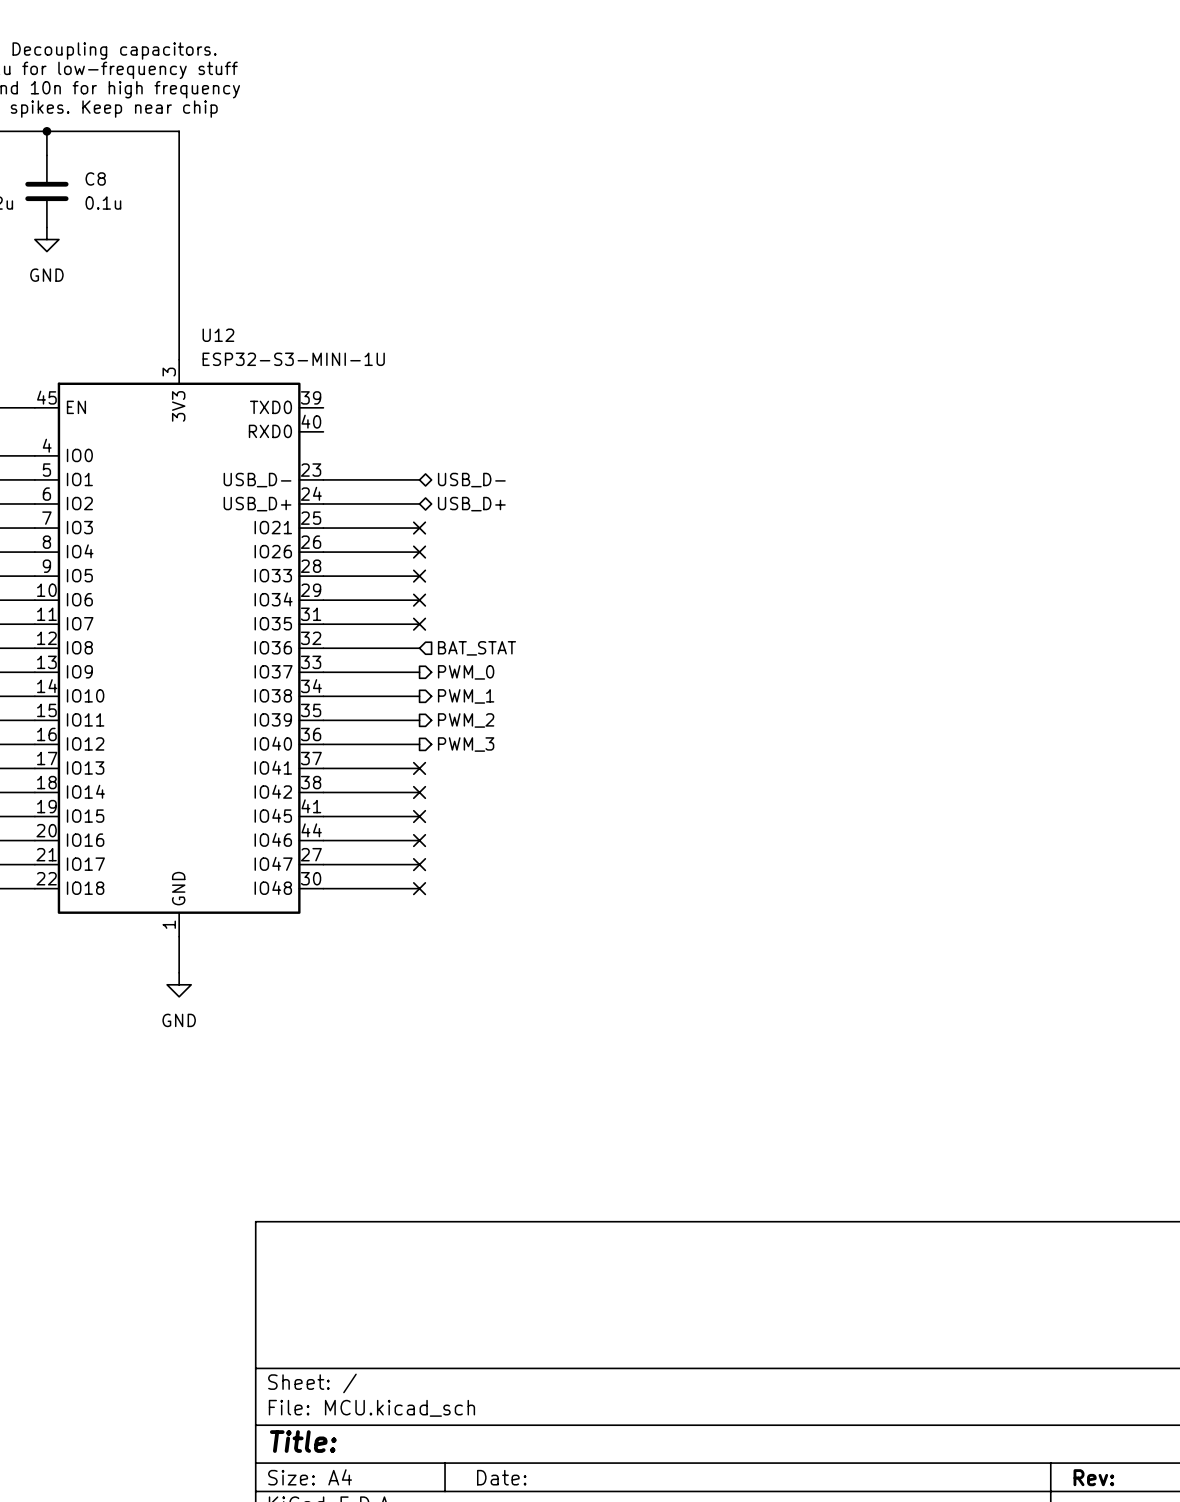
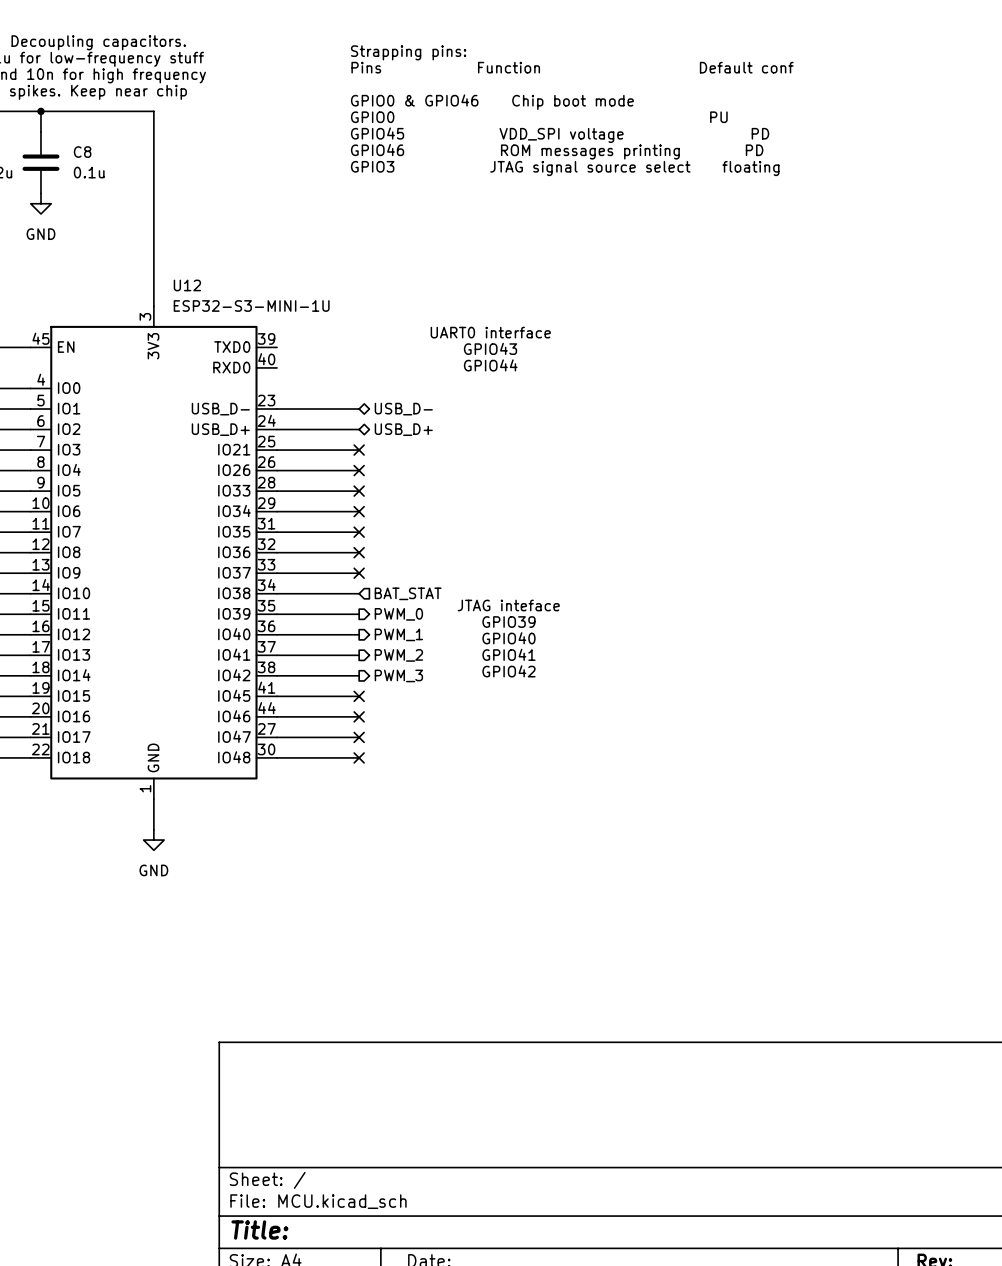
text: none -> Strapping pins: (408, 52)
text: none -> Pins Function Default conf (572, 67)
text: none -> GPIO0 & GPIO46 Chip boot mode (492, 102)
text: none -> GPIO0 PU (539, 117)
text: none -> GPIO45 VDD_SPI voltage PD (560, 135)
text: none -> GPIO46 ROM messages printing PD (557, 151)
text: none -> GPIO3 JTAG signal source select floating (565, 168)
text: none -> UART0 interface (490, 332)
text: none -> GPIO43 (490, 348)
text: none -> GPIO44 (490, 365)
no-connect mark: none -> (359, 552)
hierarchical label: BAT_STAT (476, 648) -> none
no-connect mark: none -> (359, 573)
hierarchical label: PWM_0 (466, 672) -> none
hierarchical label shape: output (466, 696) -> input (408, 593)
hierarchical label: PWM_1 (466, 696) -> BAT_STAT (408, 593)
text: none -> JTAG inteface (508, 605)
hierarchical label: PWM_2 (466, 720) -> PWM_0 (398, 614)
text: none -> GPIO39 (508, 622)
hierarchical label: PWM_3 (466, 744) -> PWM_1 (398, 634)
text: none -> GPIO40 (508, 638)
text: none -> GPIO41 (508, 654)
no-connect mark: (419, 768) -> none
hierarchical label: none -> PWM_2 (398, 655)
text: none -> GPIO42 (508, 671)
no-connect mark: (419, 792) -> none
hierarchical label: none -> PWM_3 (398, 675)

